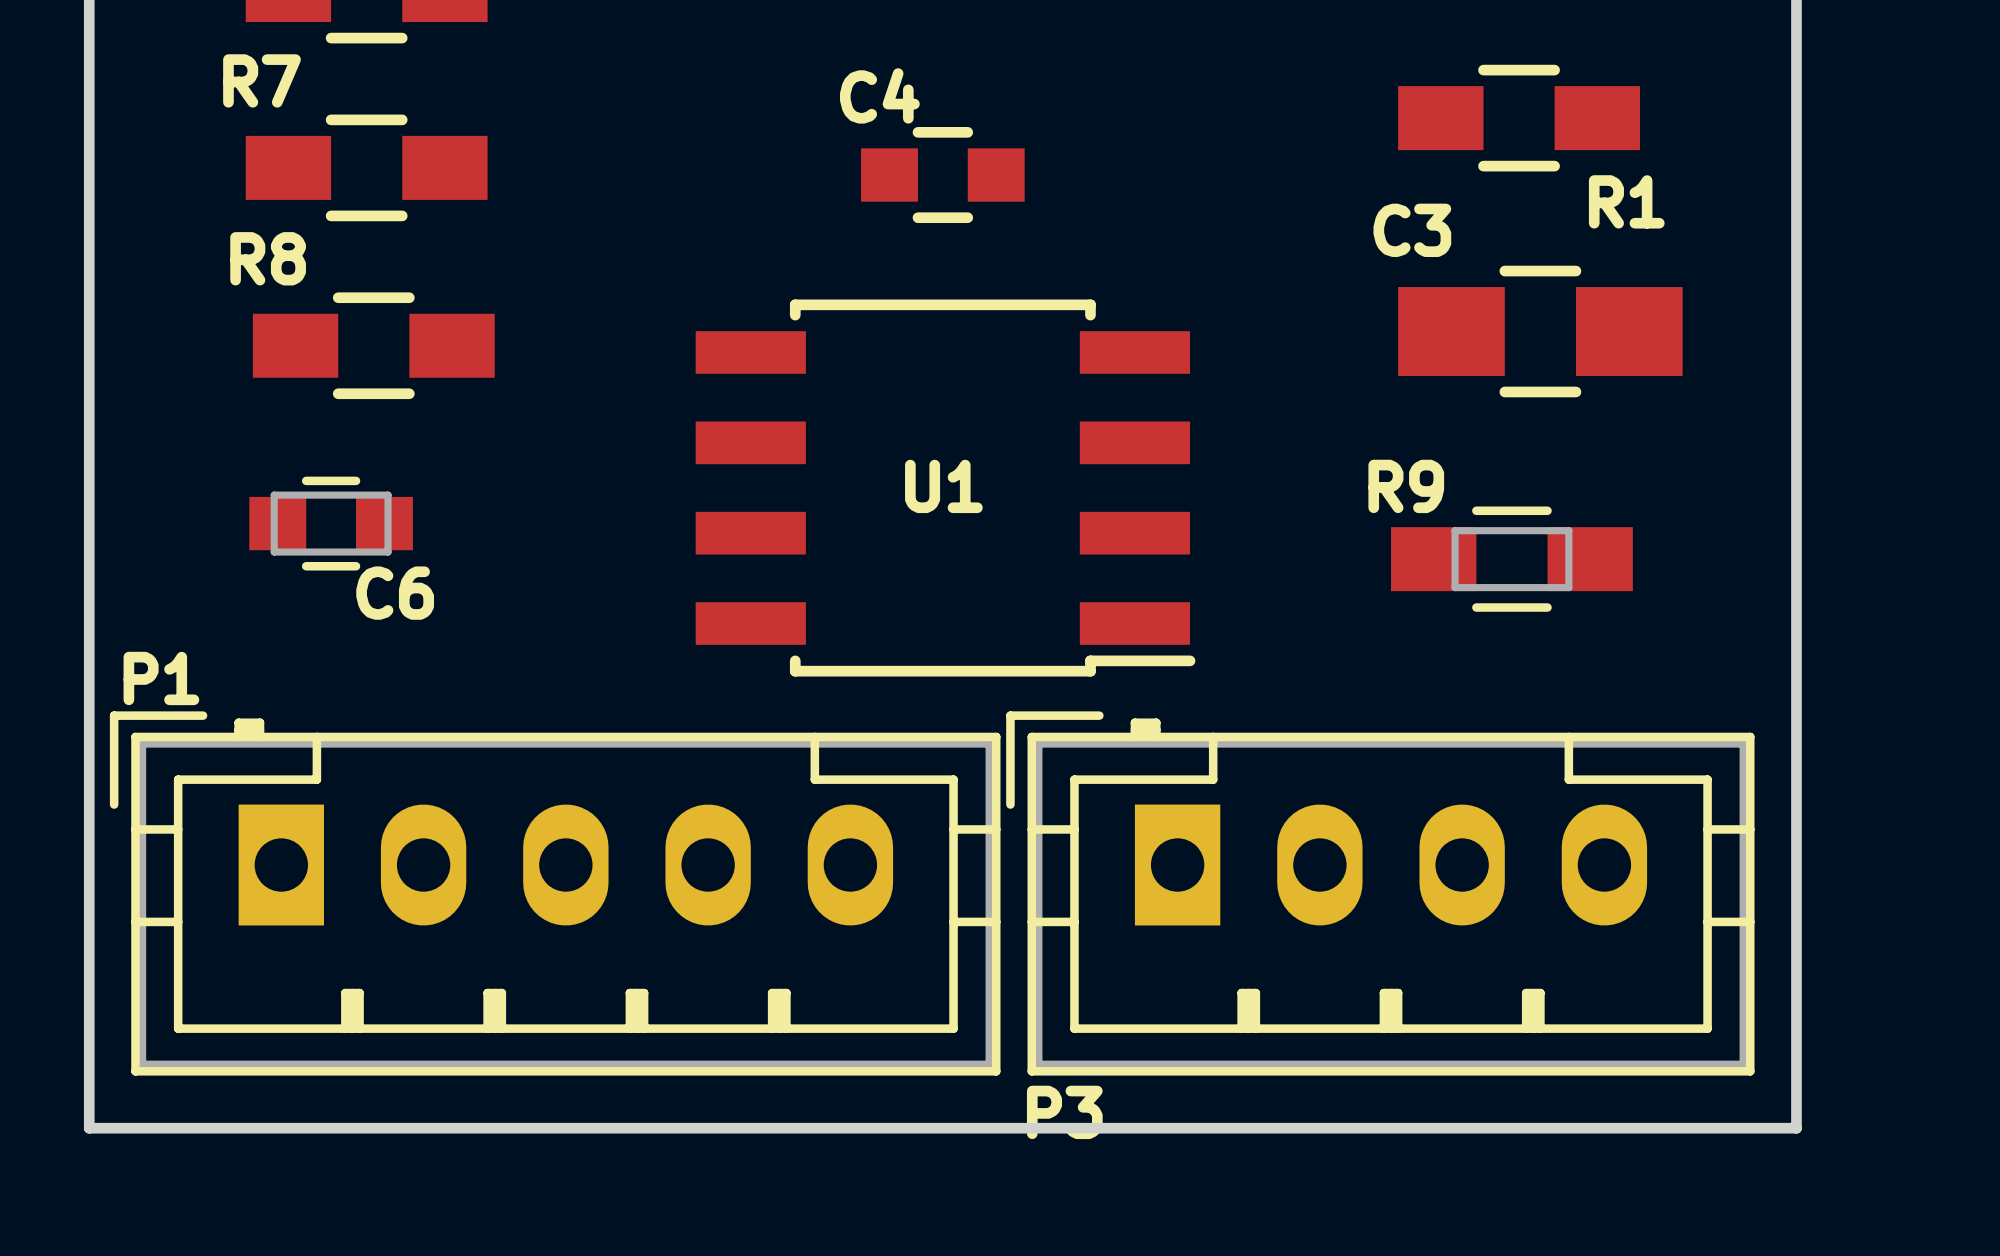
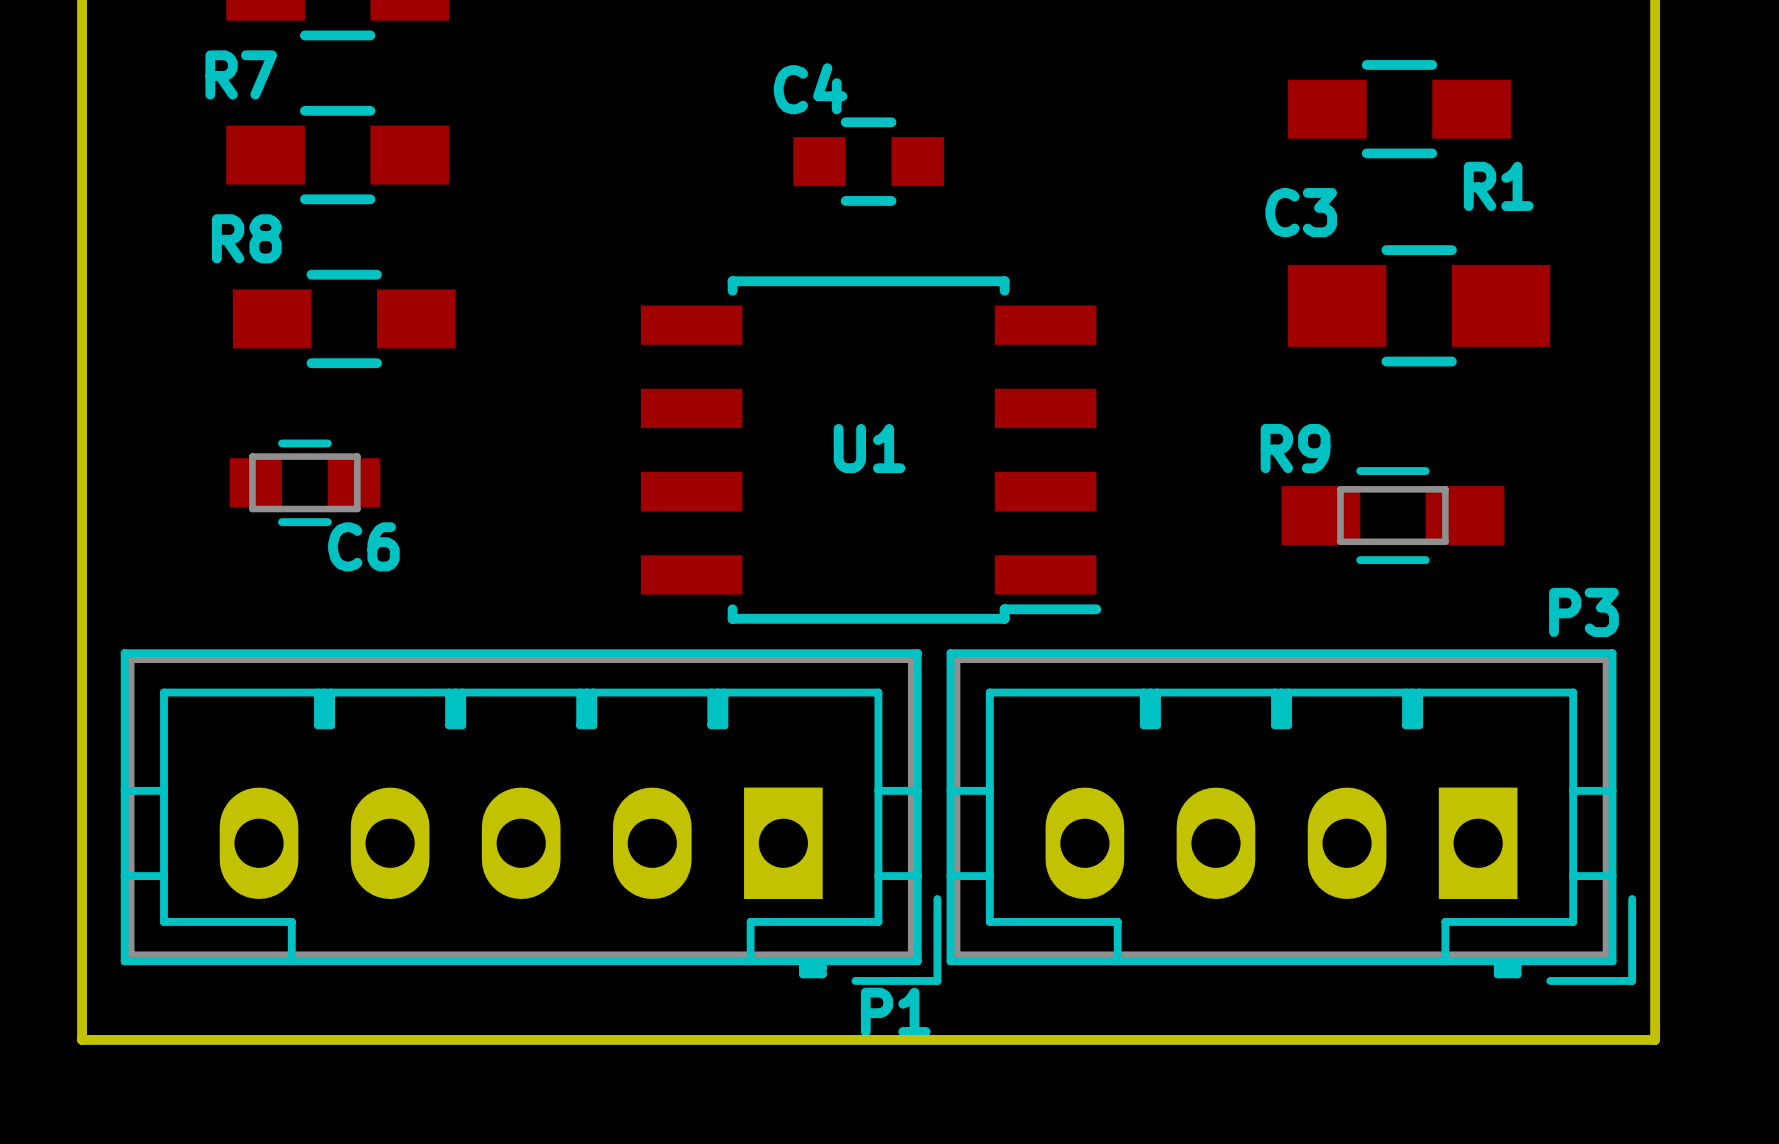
P1 rotation: 0° (555, 893) -> 180° (531, 817)
P3 rotation: 0° (1380, 893) -> 180° (1291, 817)

